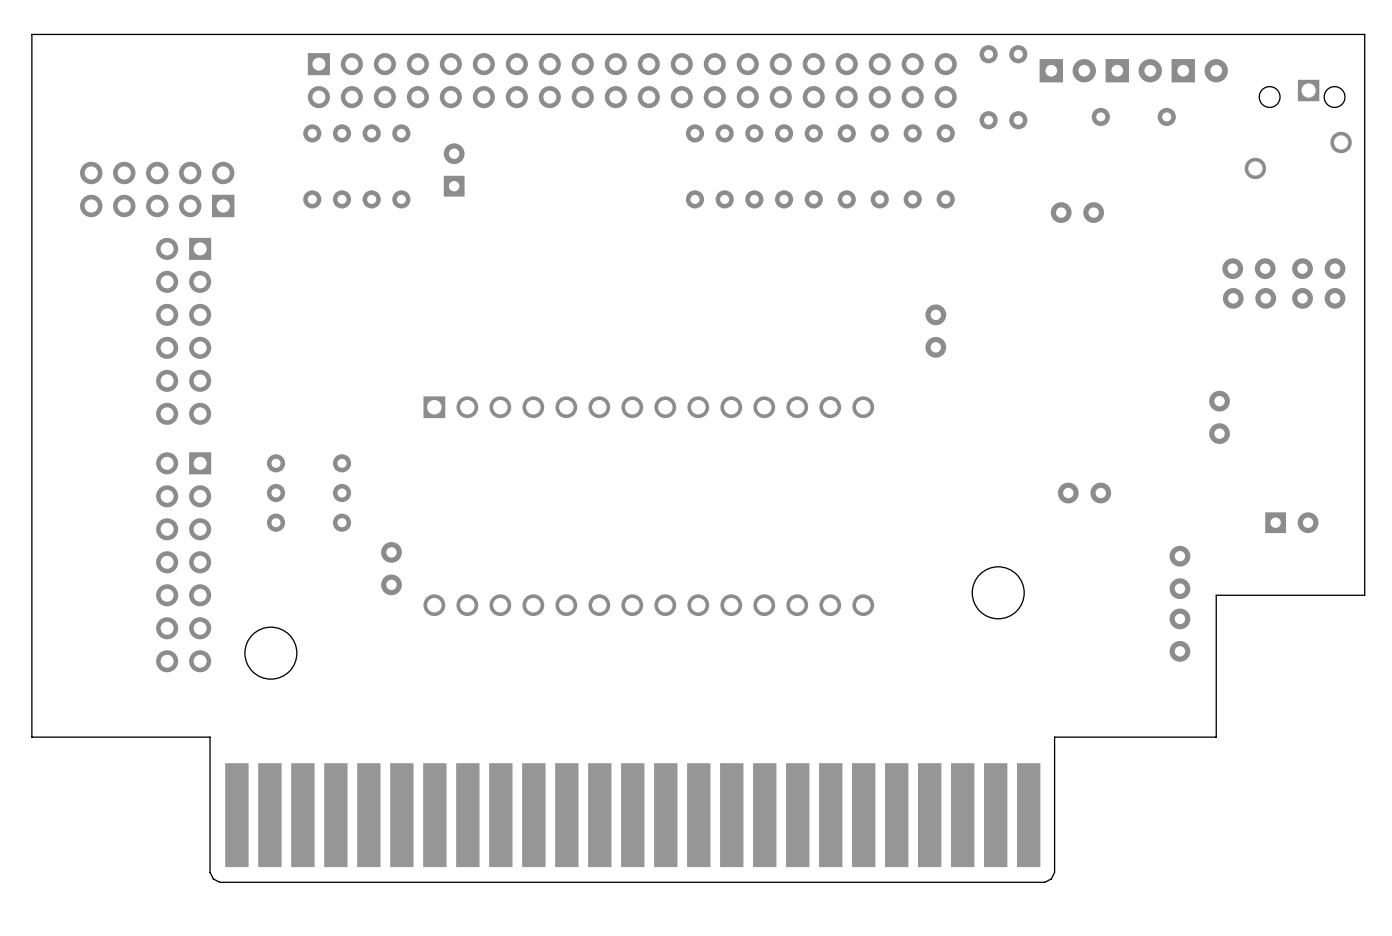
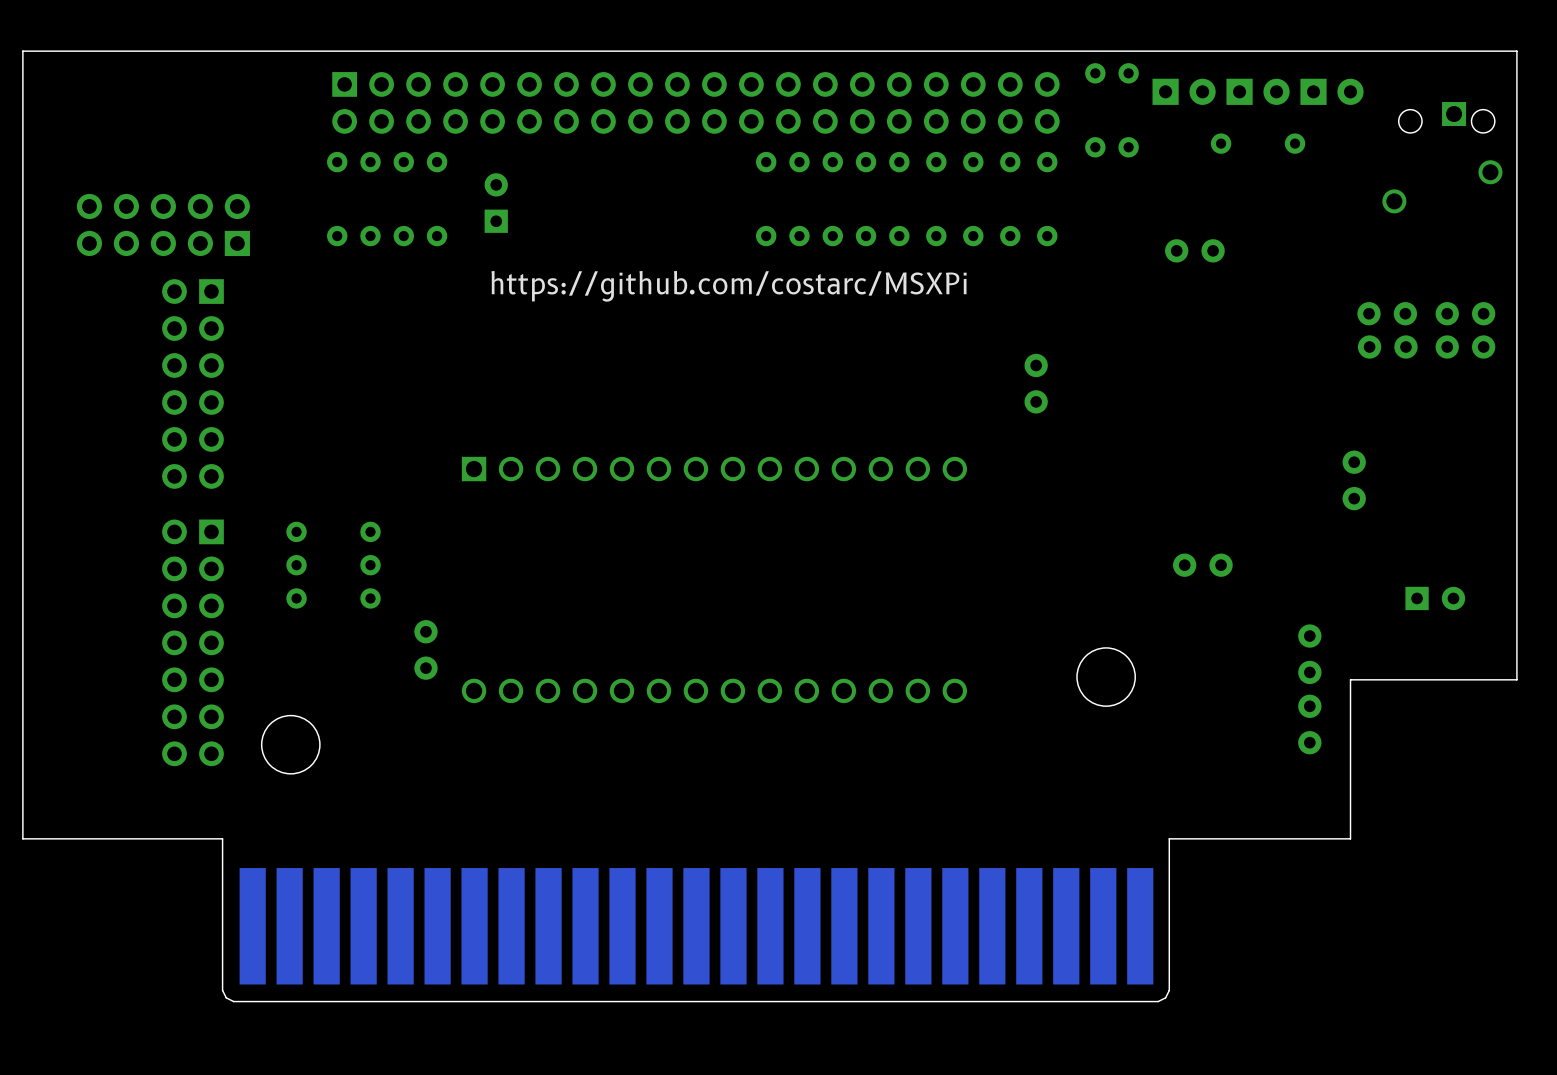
text: none -> https://github.com/costarc/MSXPi (729, 286)

